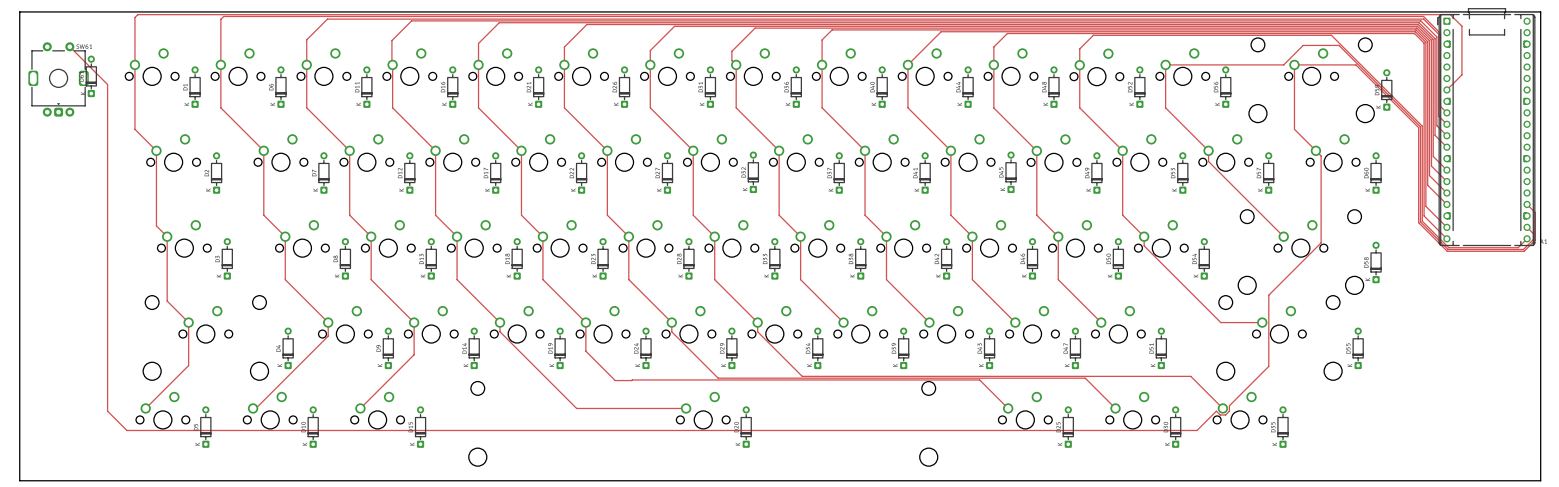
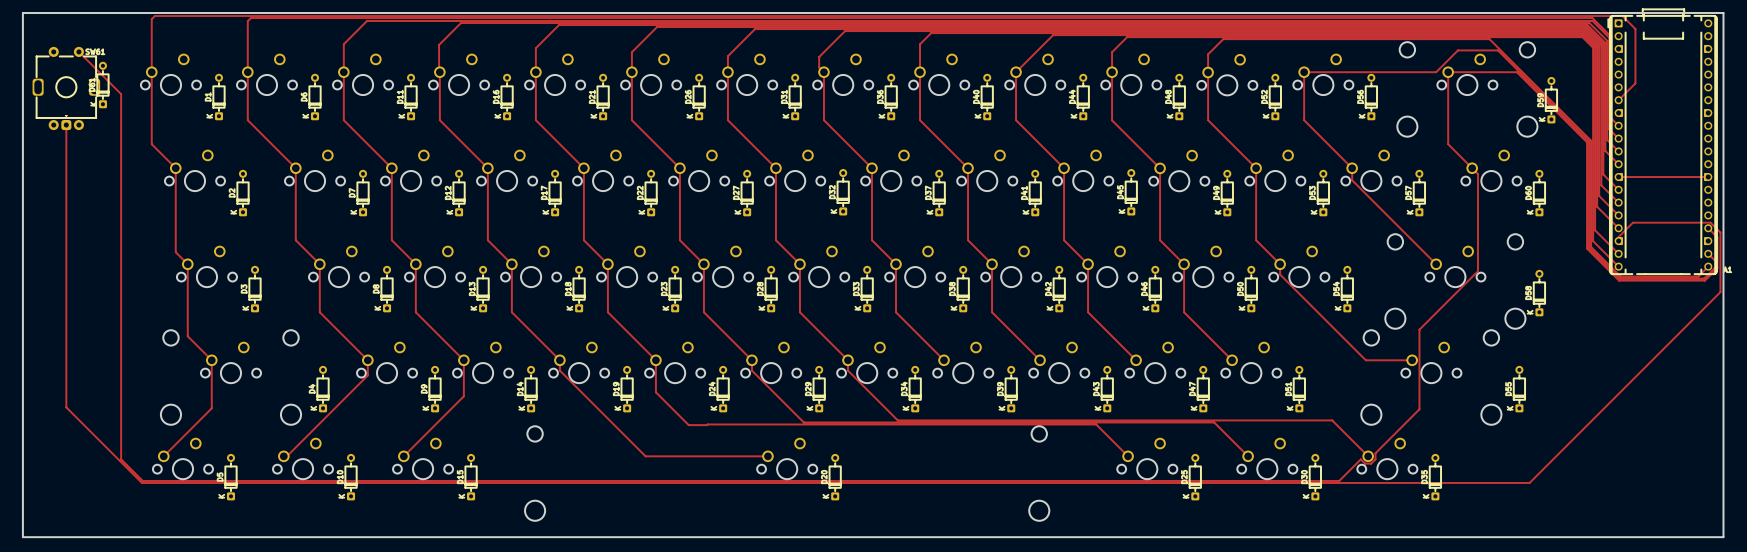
track: none -> (66, 125) (66, 407) (141, 482) (1529, 482) (1720, 292) (1720, 232) (1710, 222) (1632, 222) (1618, 236) (1618, 241)
track: none -> (1618, 177) (1708, 177)

